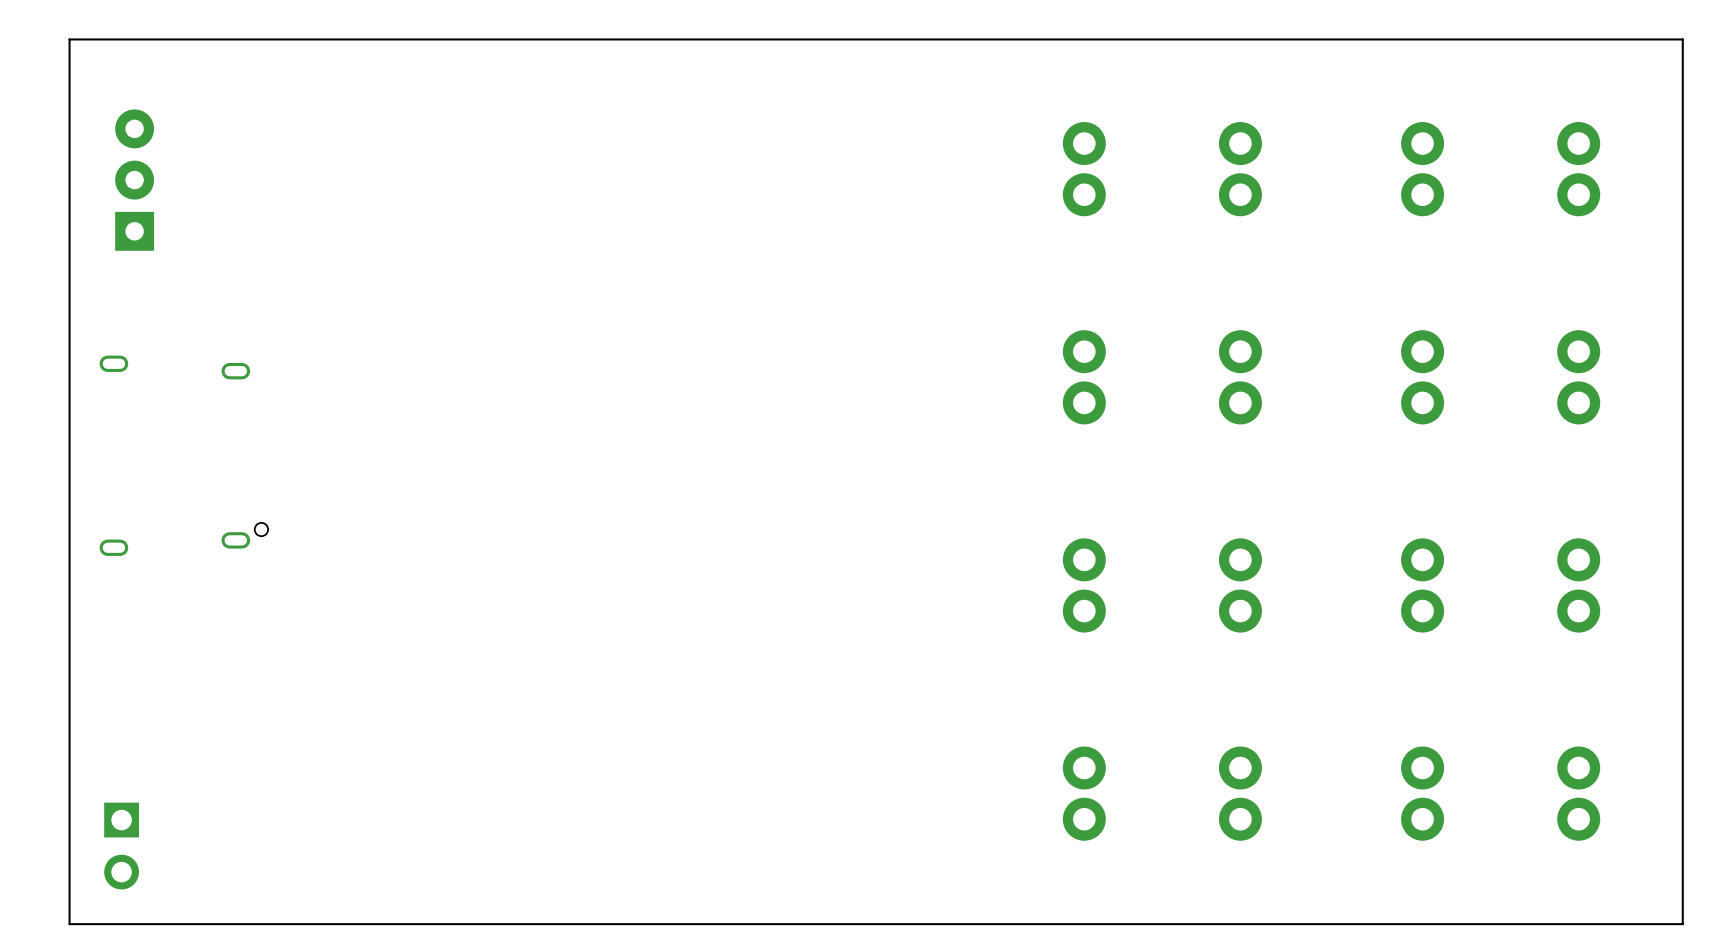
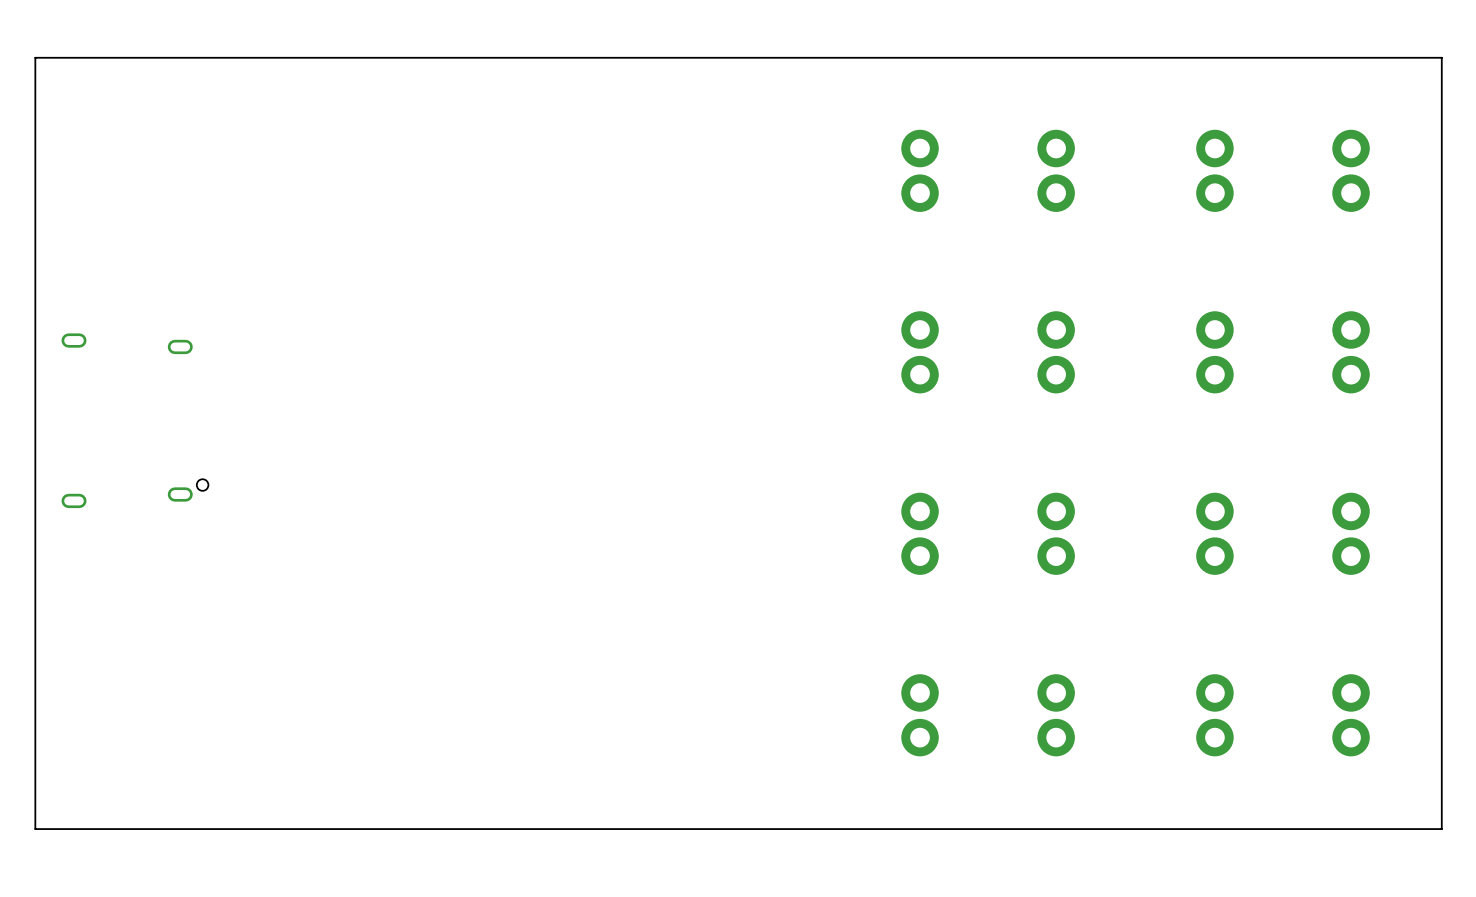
part: (134, 180) -> none
part: (121, 846) -> none

